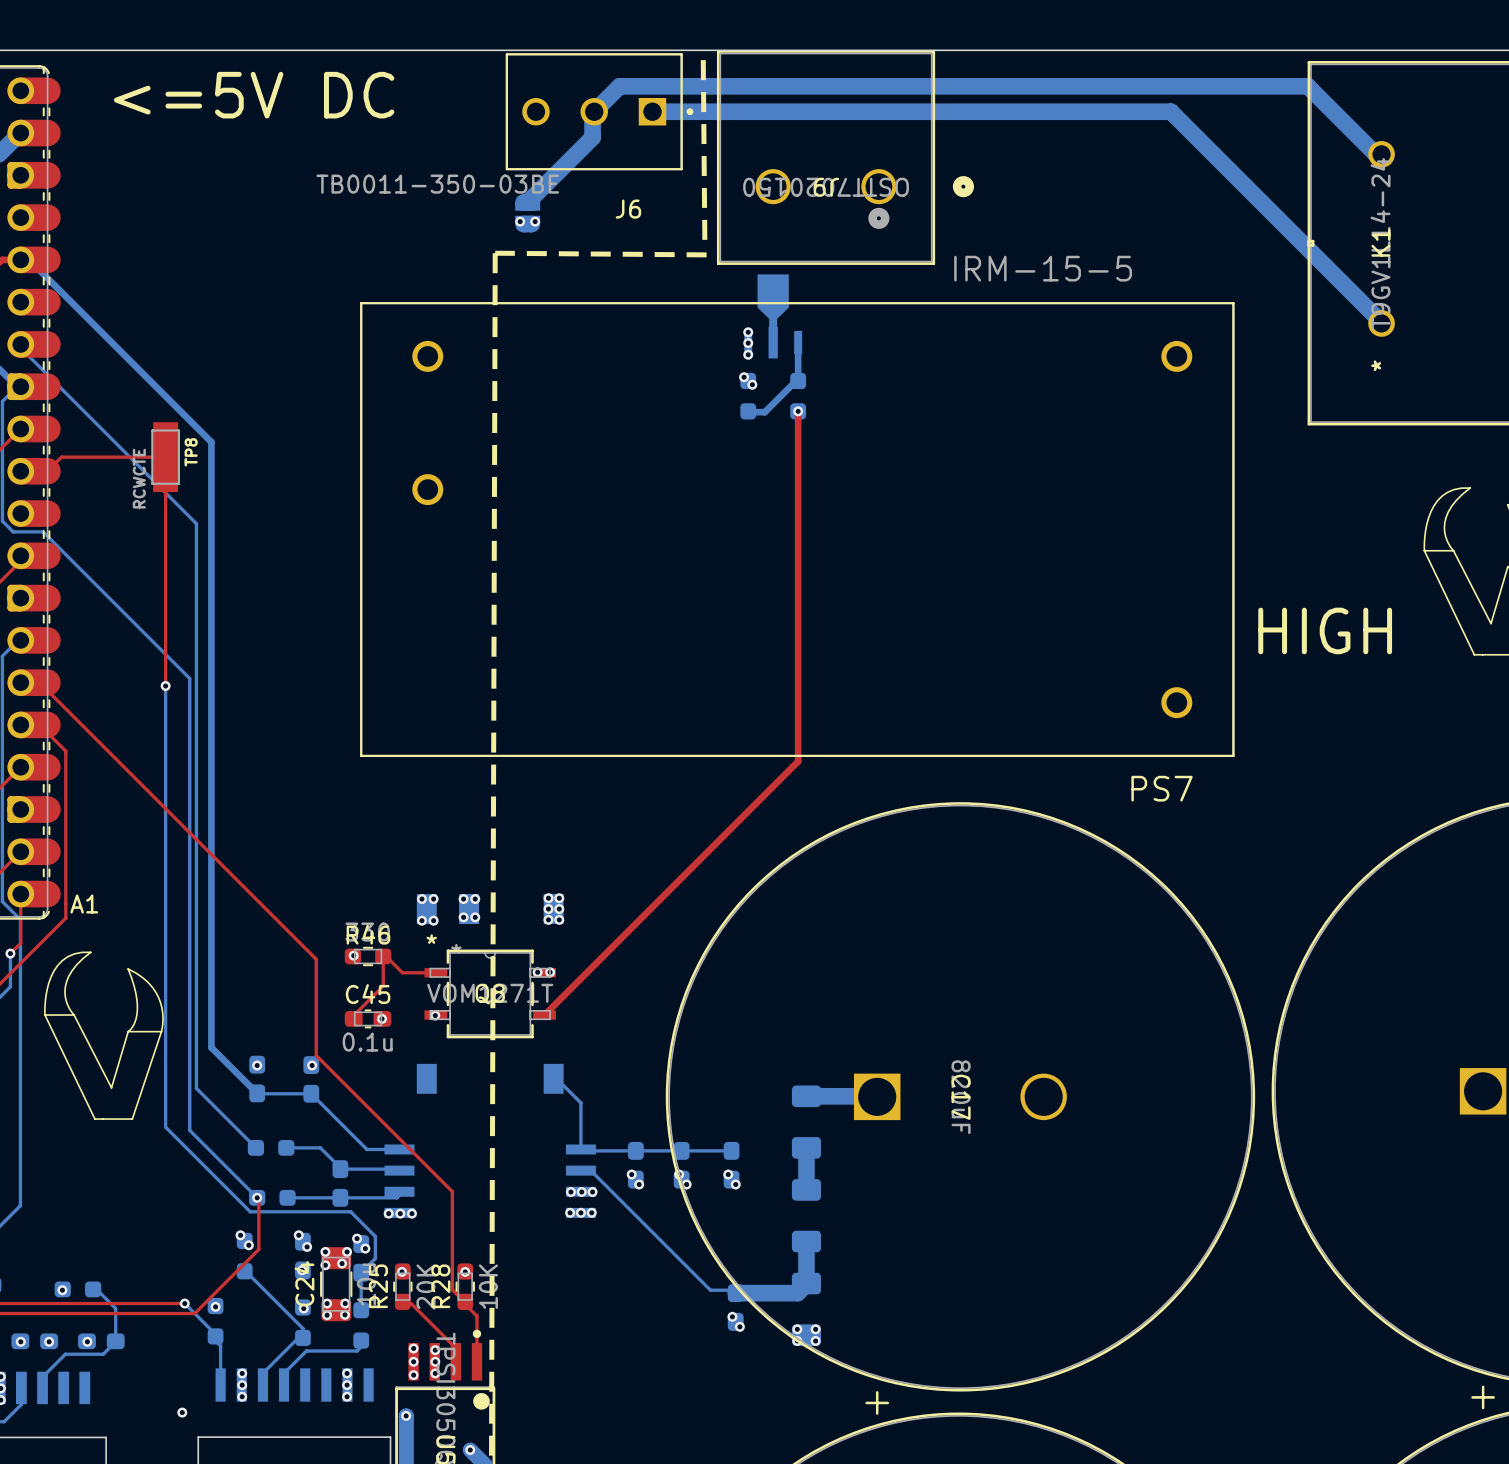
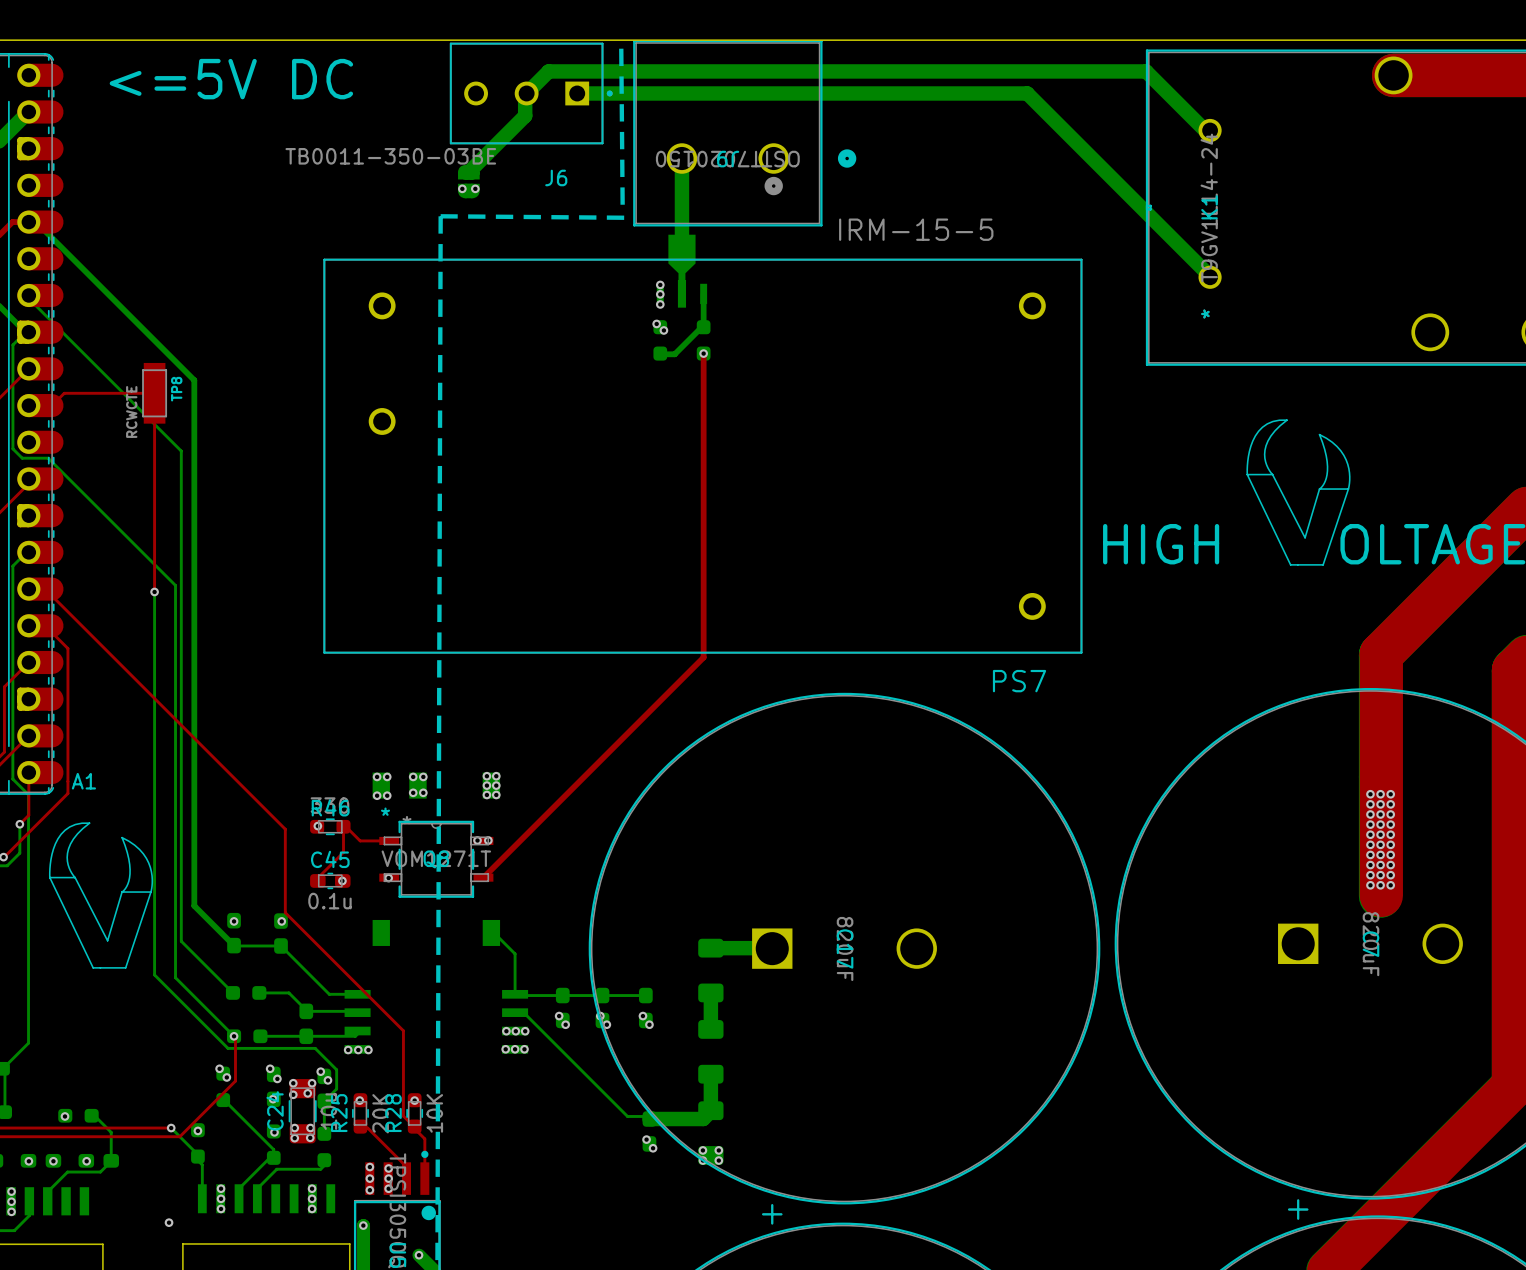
bottom track: none -> (681, 158) (682, 243)
part footprint: [744, 274, 803, 359] -> [656, 234, 708, 308]

